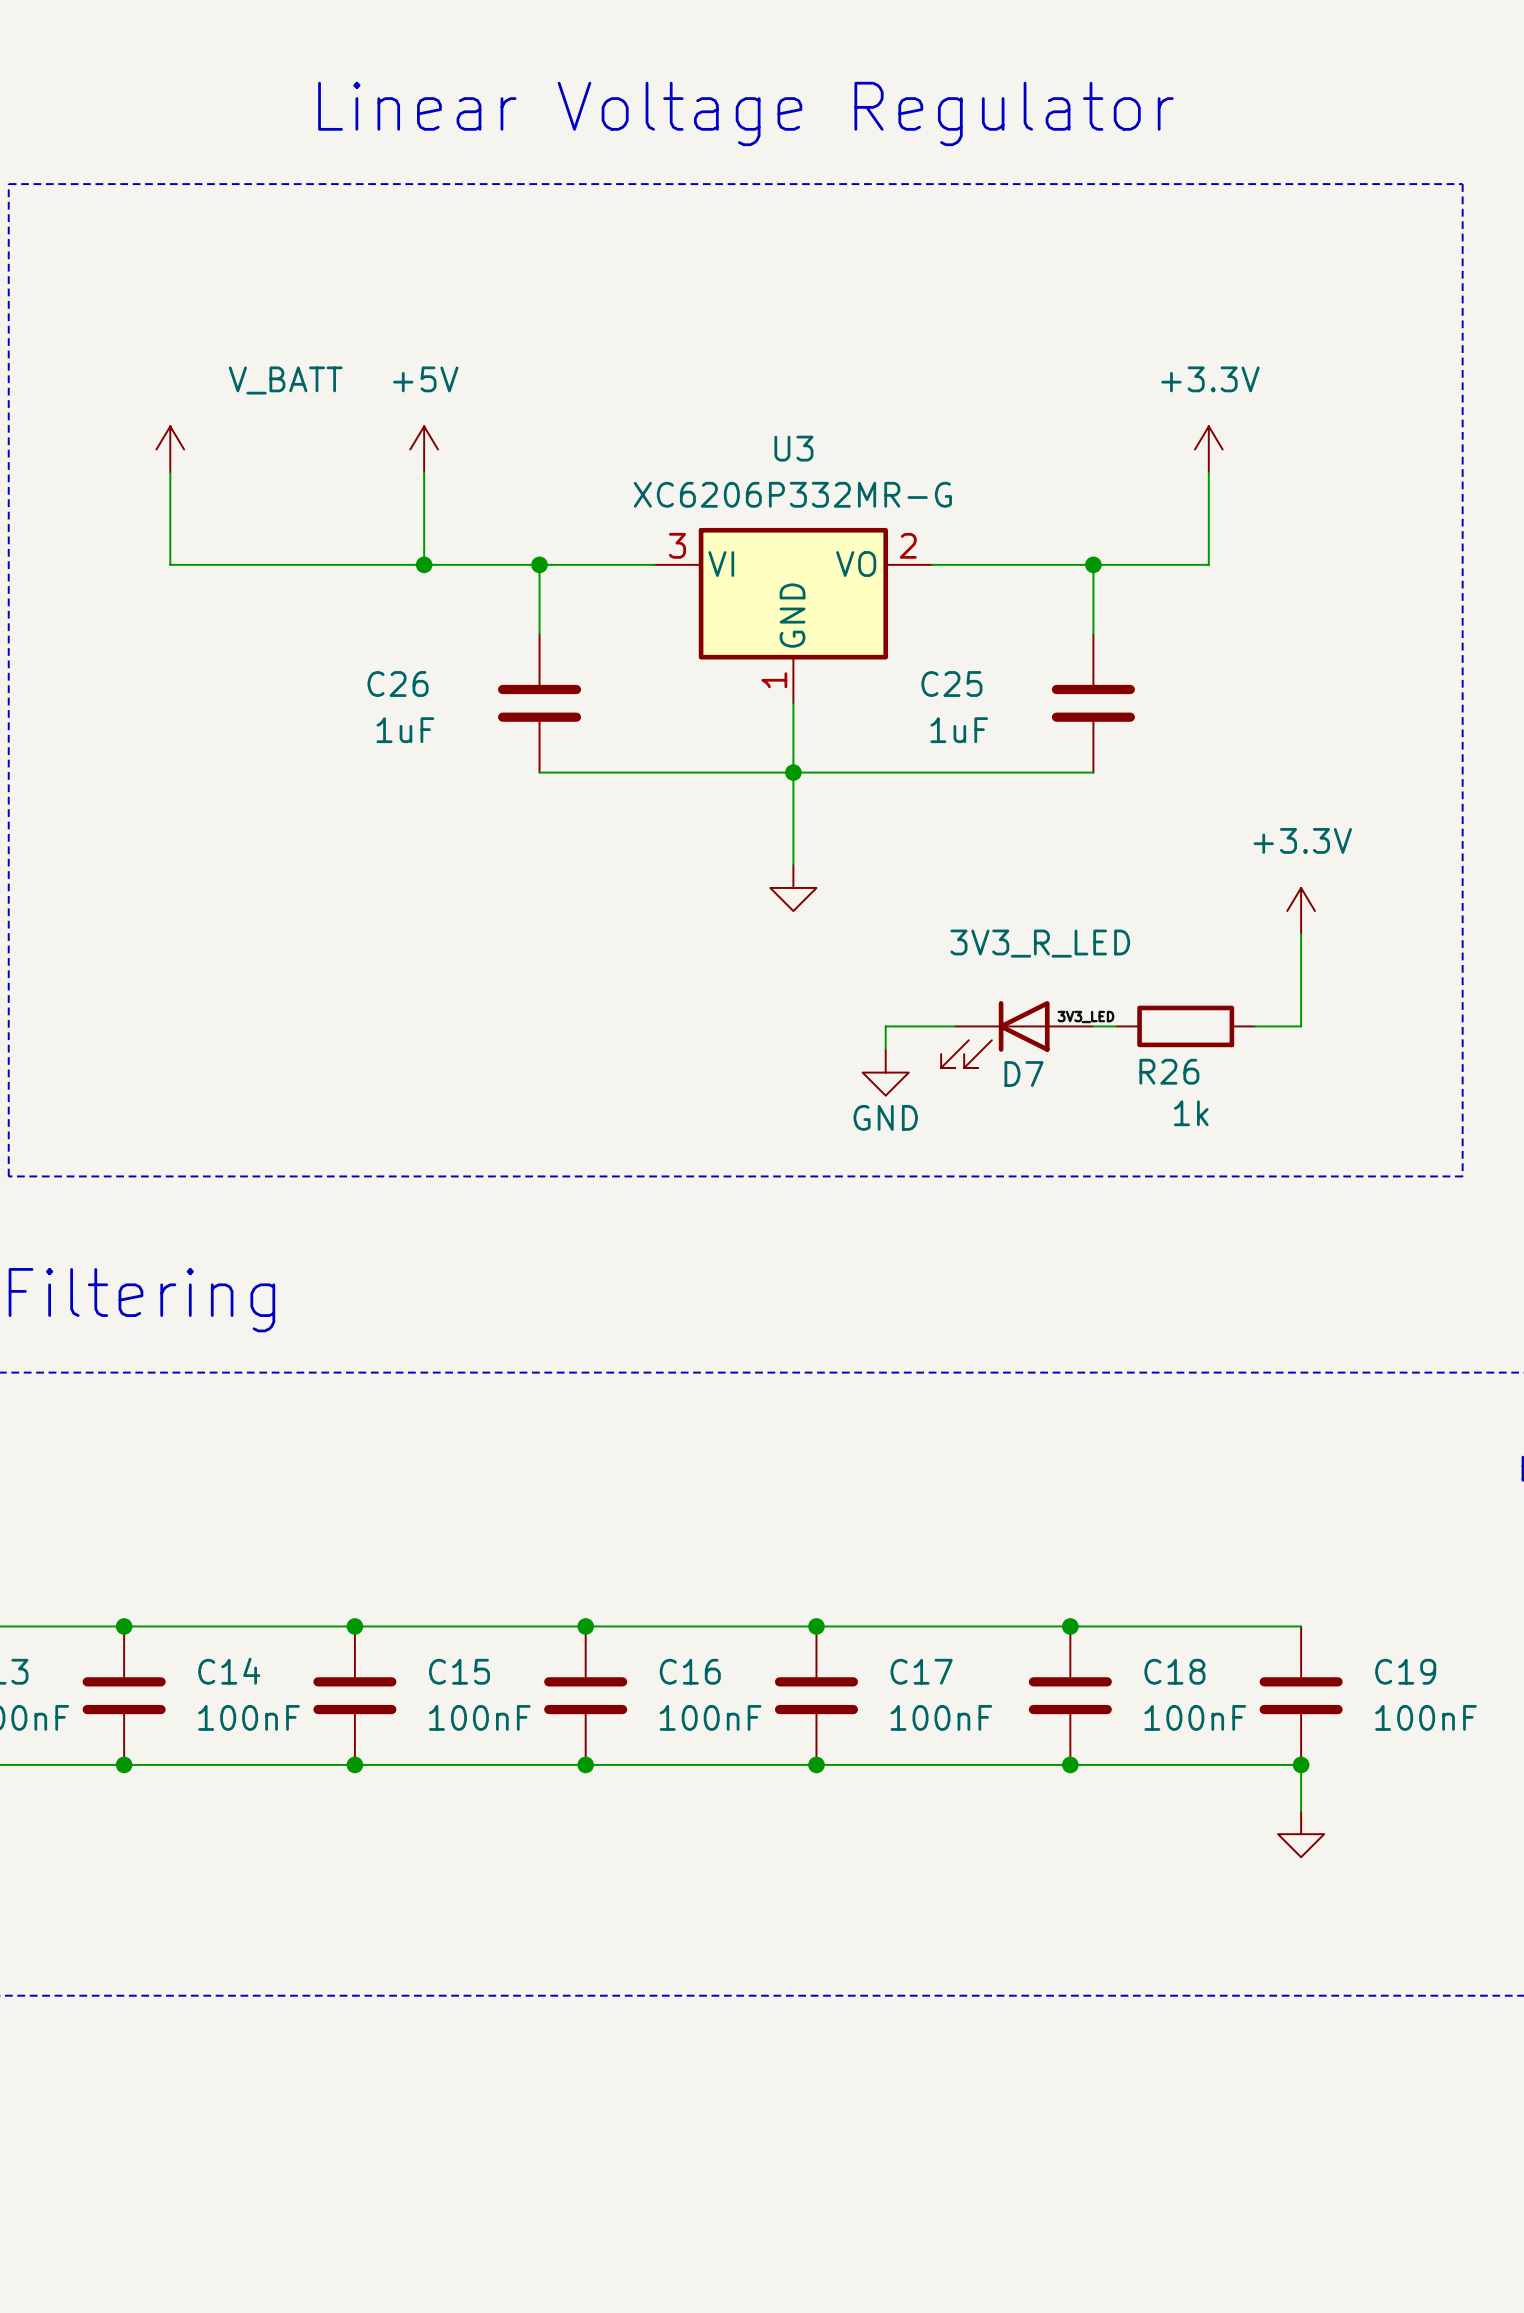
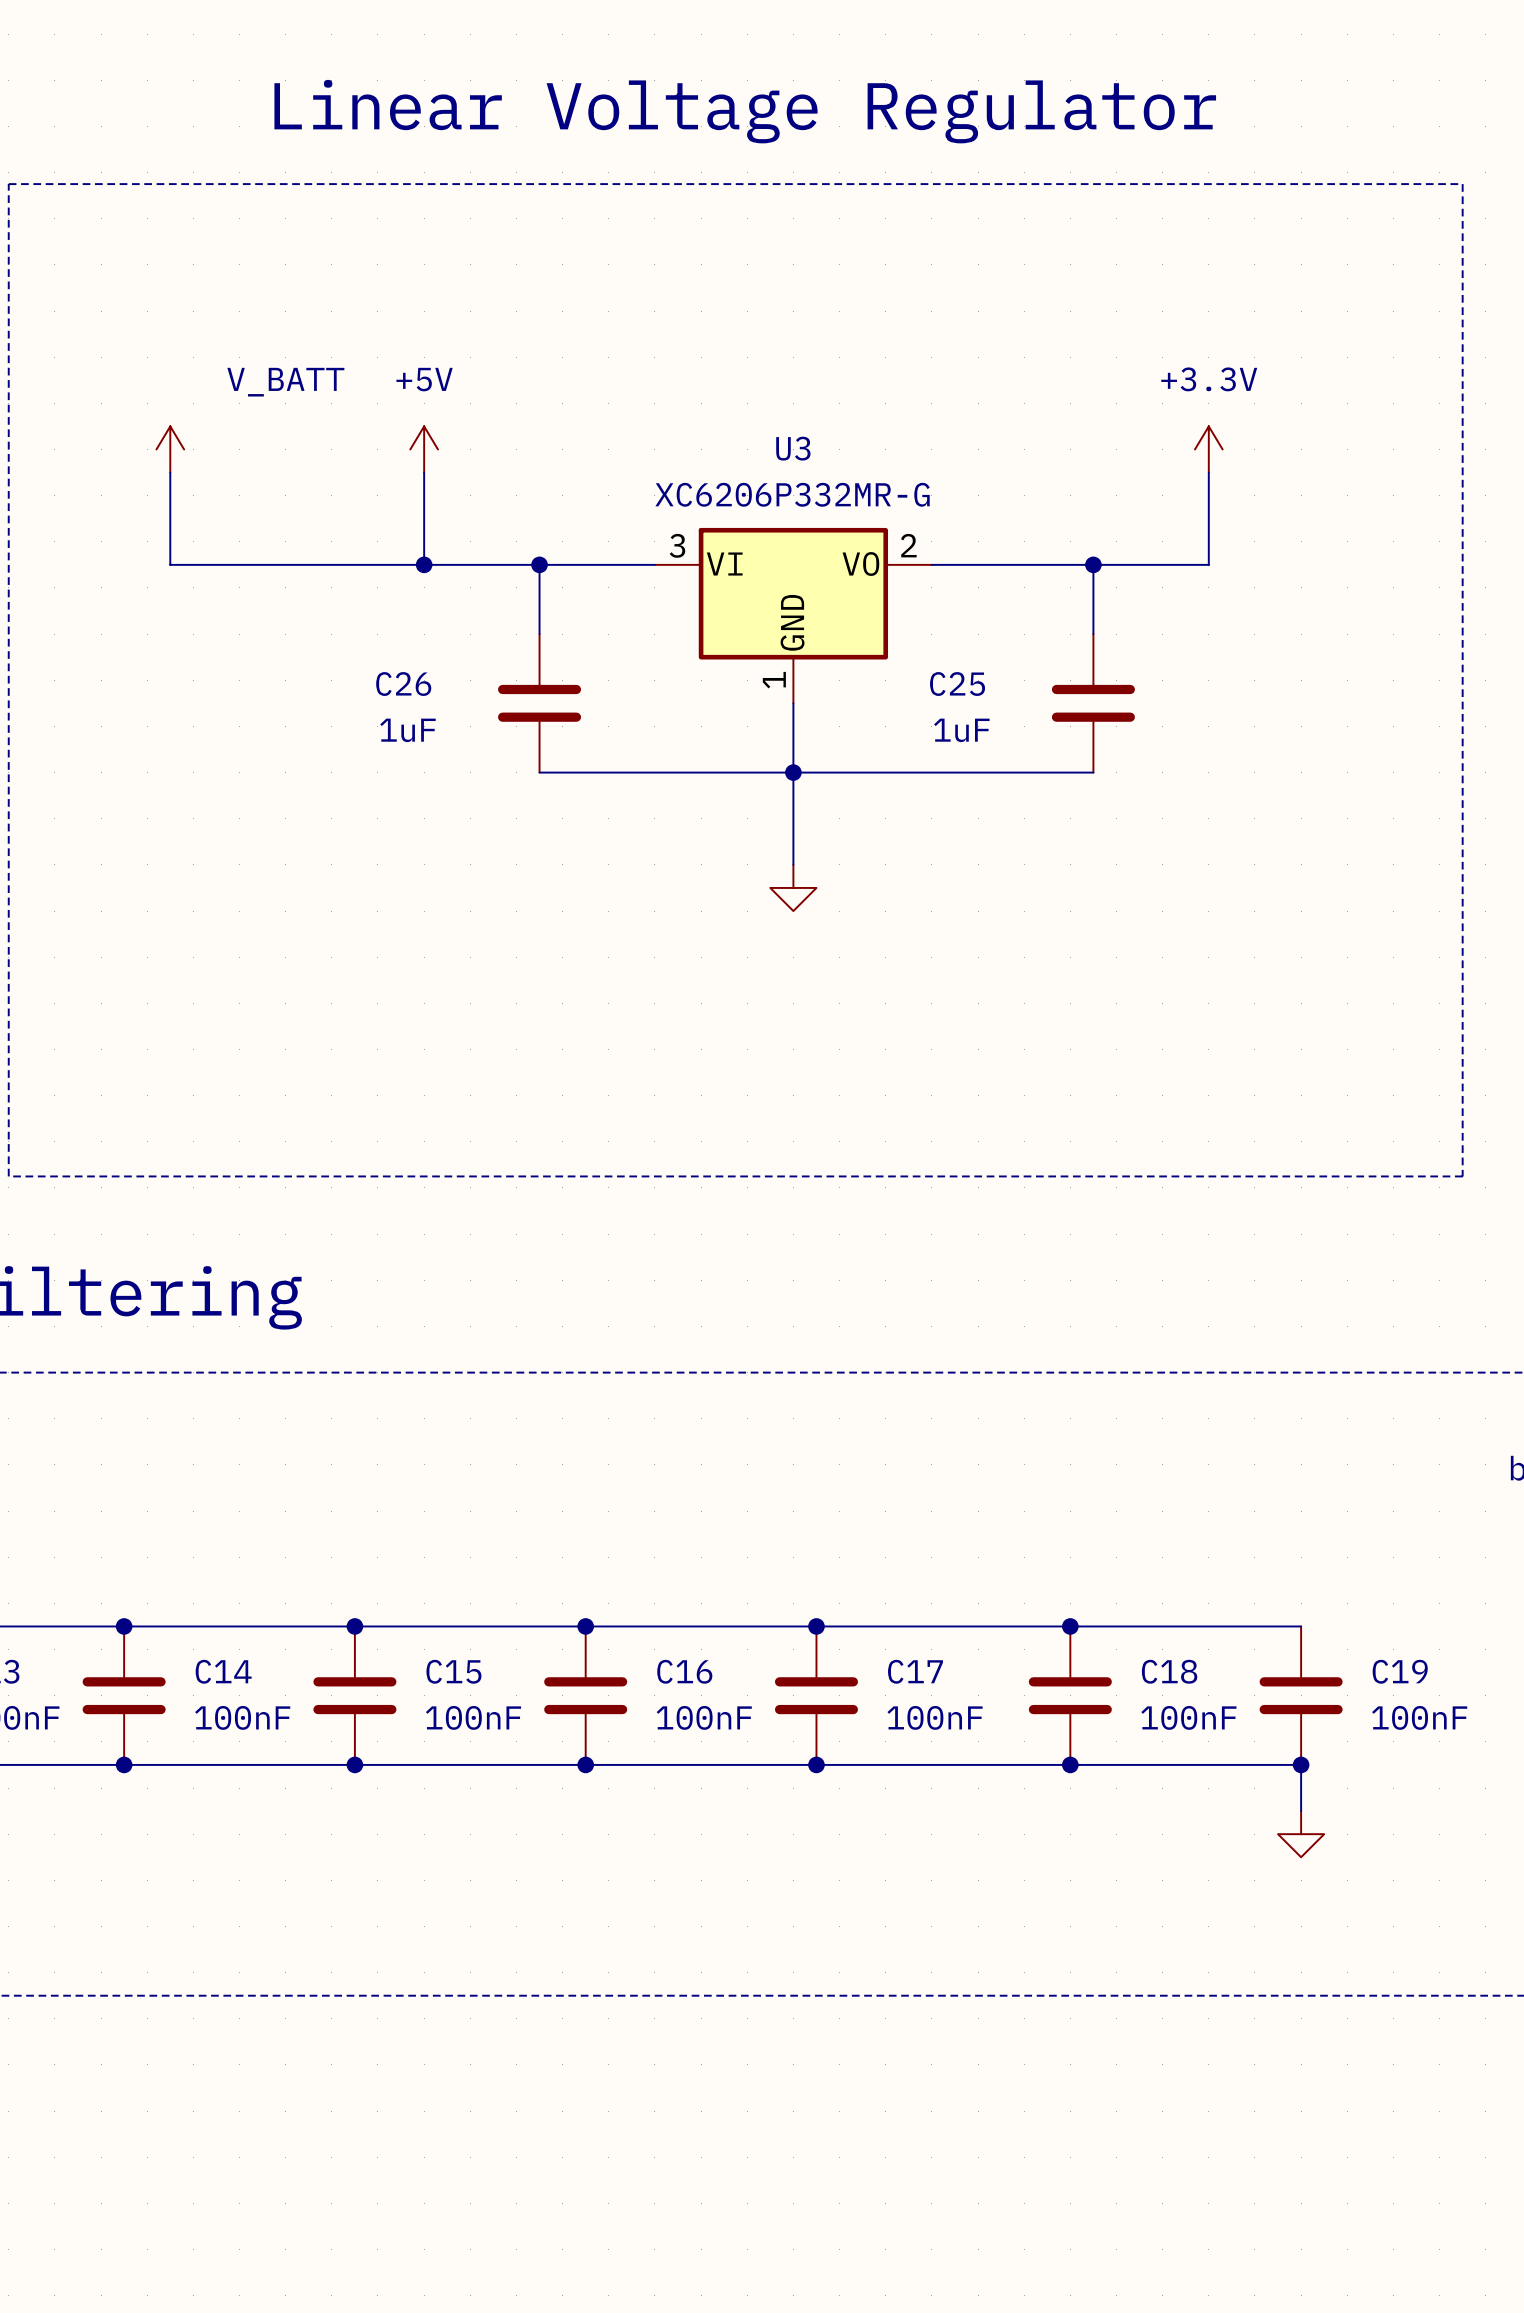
power symbol: +3.3V (1301, 911) -> none
wire: (1301, 934) (1301, 1026) (1254, 1026) -> none
label: 3V3_LED (1085, 1016) -> none
wire: (954, 1026) (885, 1026) (885, 1049) -> none
wire: (1093, 1026) (1116, 1026) -> none
R26: 1k (1185, 1026) -> none
D7: 3V3_R_LED (1017, 1034) -> none
power symbol: GND (885, 1072) -> none

